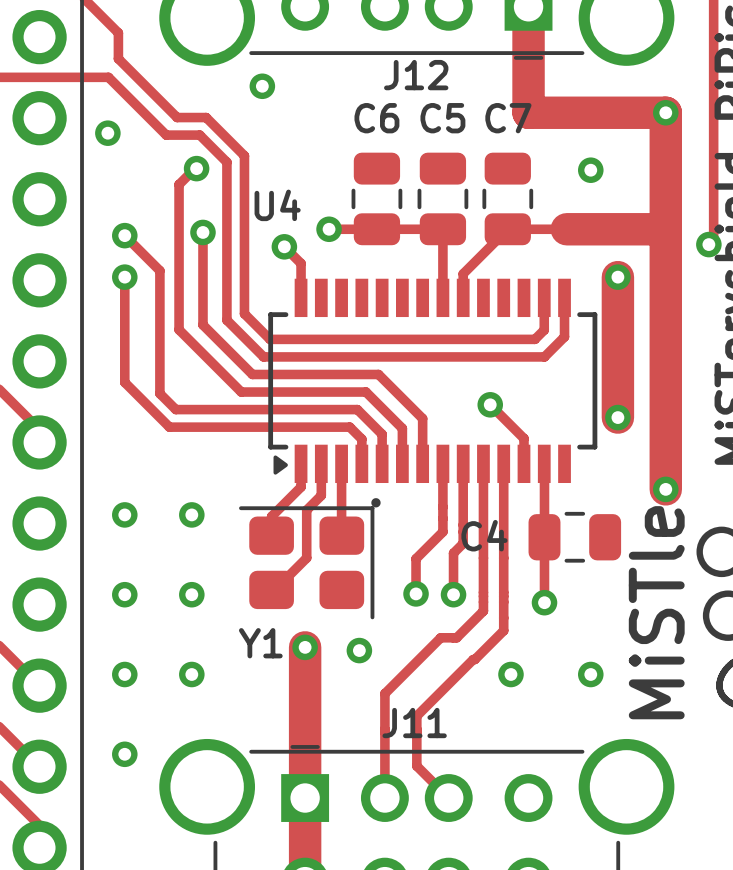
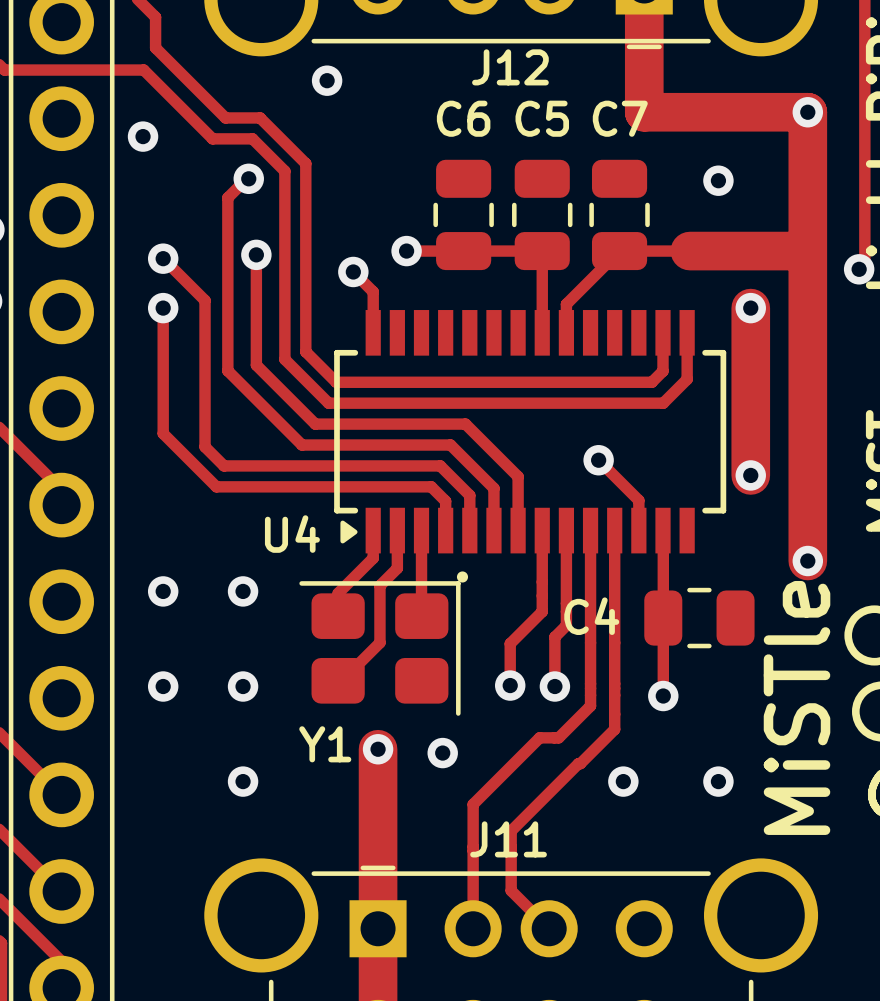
U4 name position: U4 (277, 205) -> U4 (292, 534)
via: (124, 674) -> none
via: (124, 754) -> none

